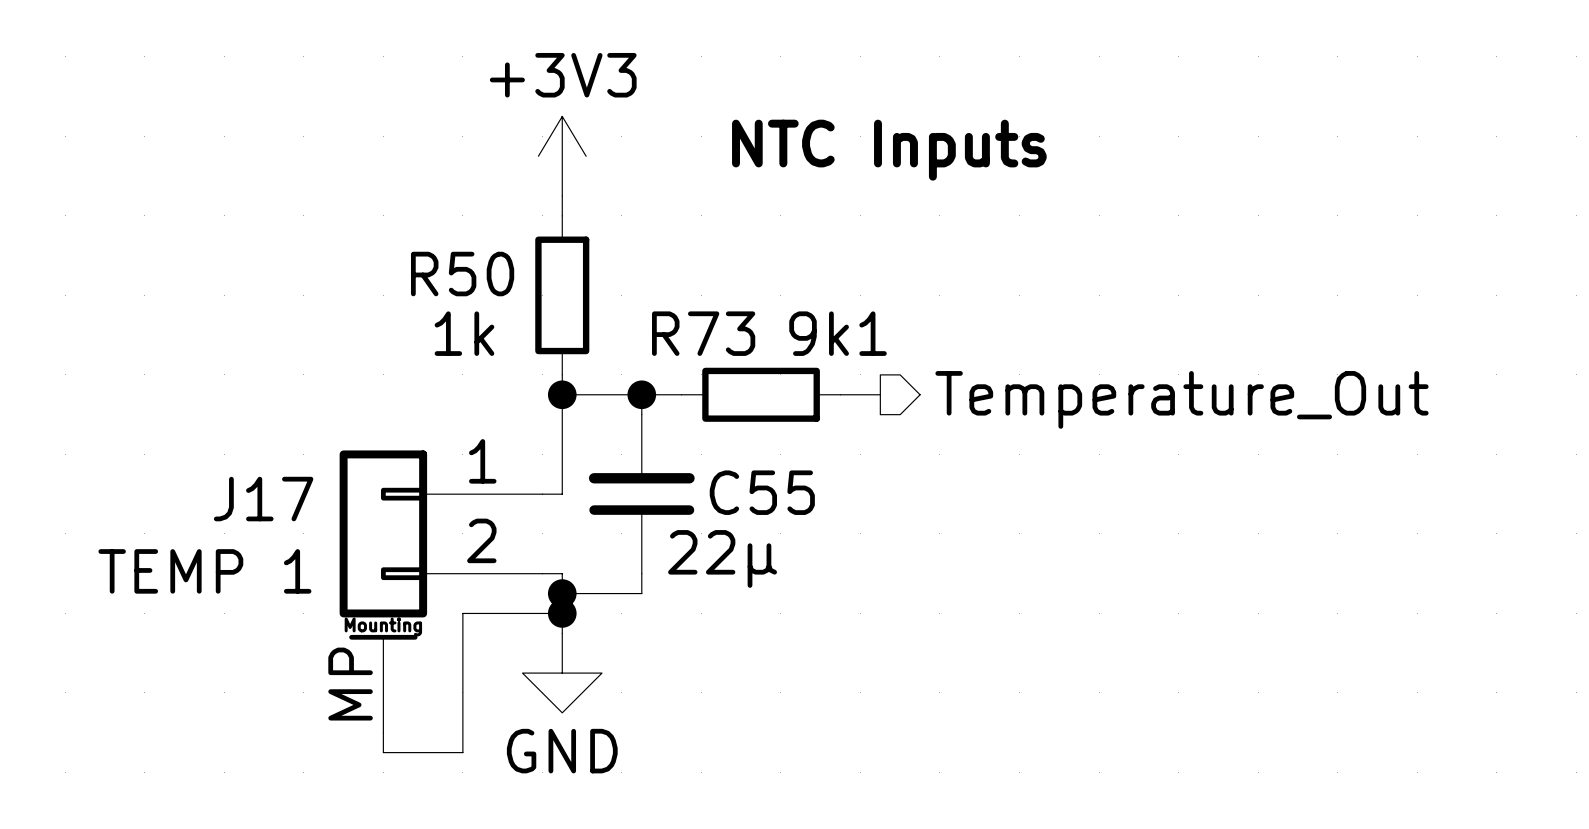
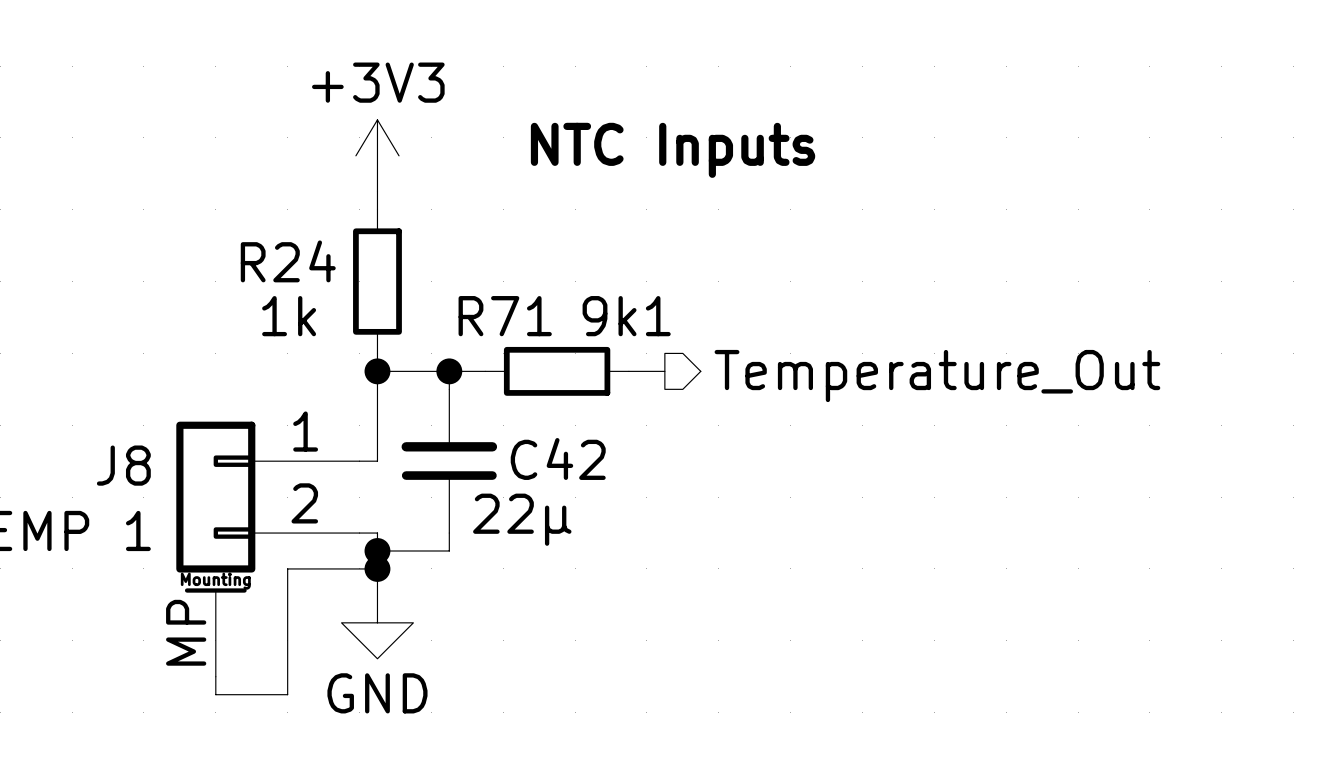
R50 name: R50 (462, 274) -> R24 (288, 261)
R73 name: R73 (703, 333) -> R71 (505, 316)
C55 name: C55 (762, 492) -> C42 (558, 458)
J17 name: J17 (263, 499) -> J8 (123, 465)

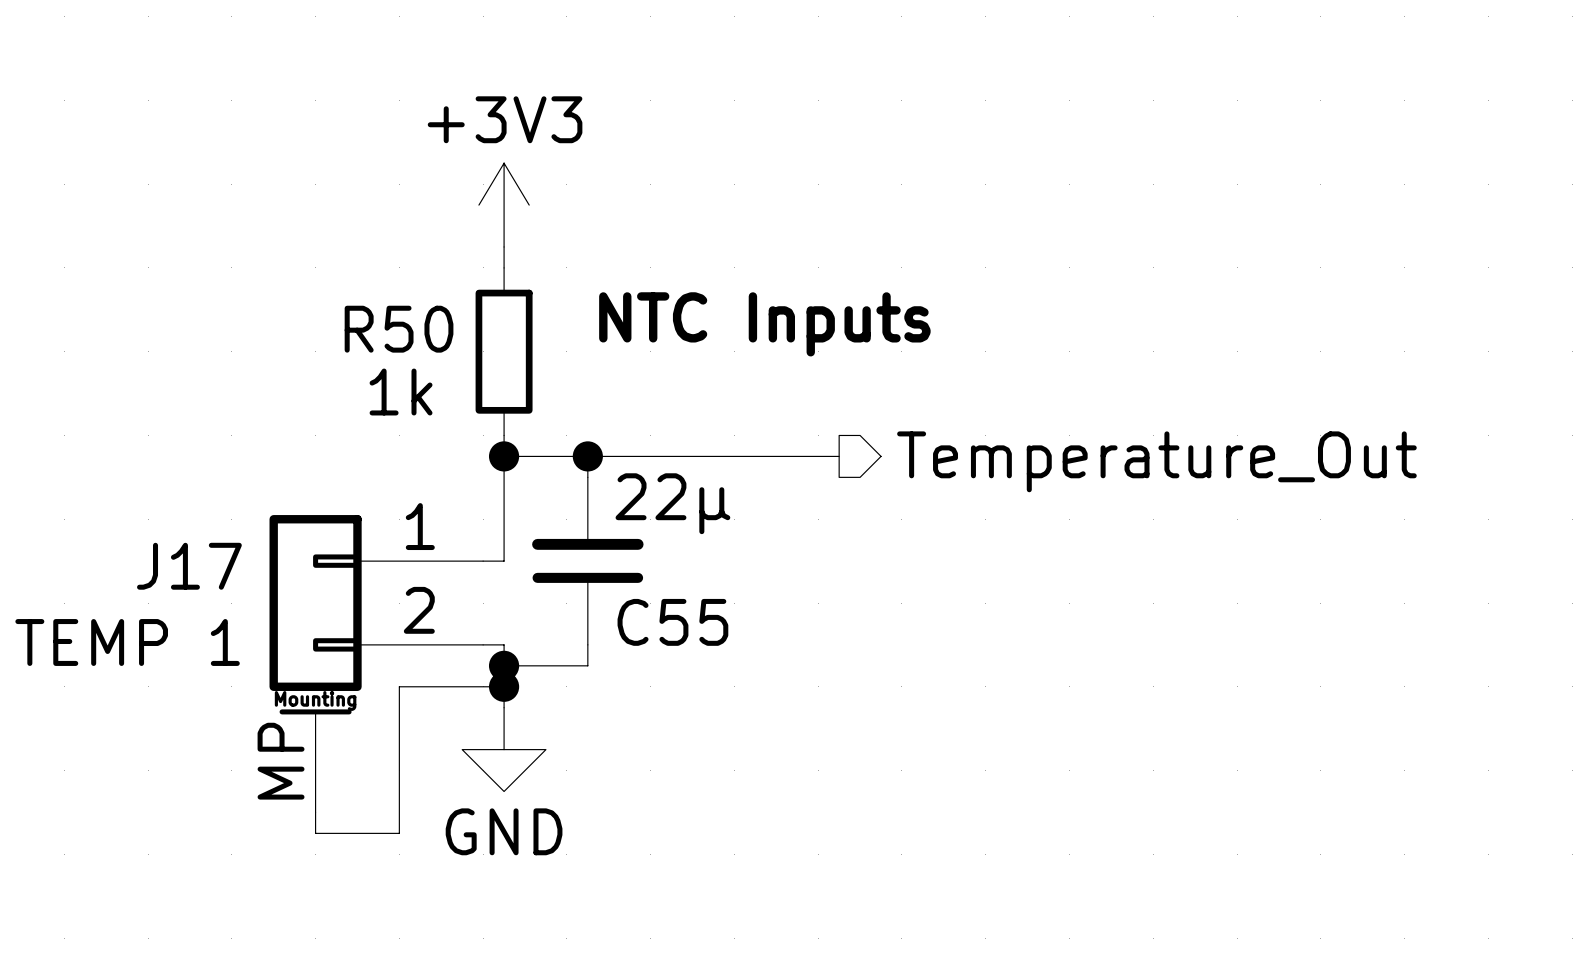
text position: NTC Inputs (673, 150) -> NTC Inputs (764, 324)
R24 name: R24 (288, 261) -> R50 (399, 329)
wire: none -> (629, 456) (797, 456)
R71: 9k1 (557, 371) -> none
C42 name: C42 (558, 458) -> C55 (672, 622)
J8 name: J8 (123, 465) -> J17 (189, 566)
C42 value position: 22µ (522, 519) -> 22µ (672, 503)

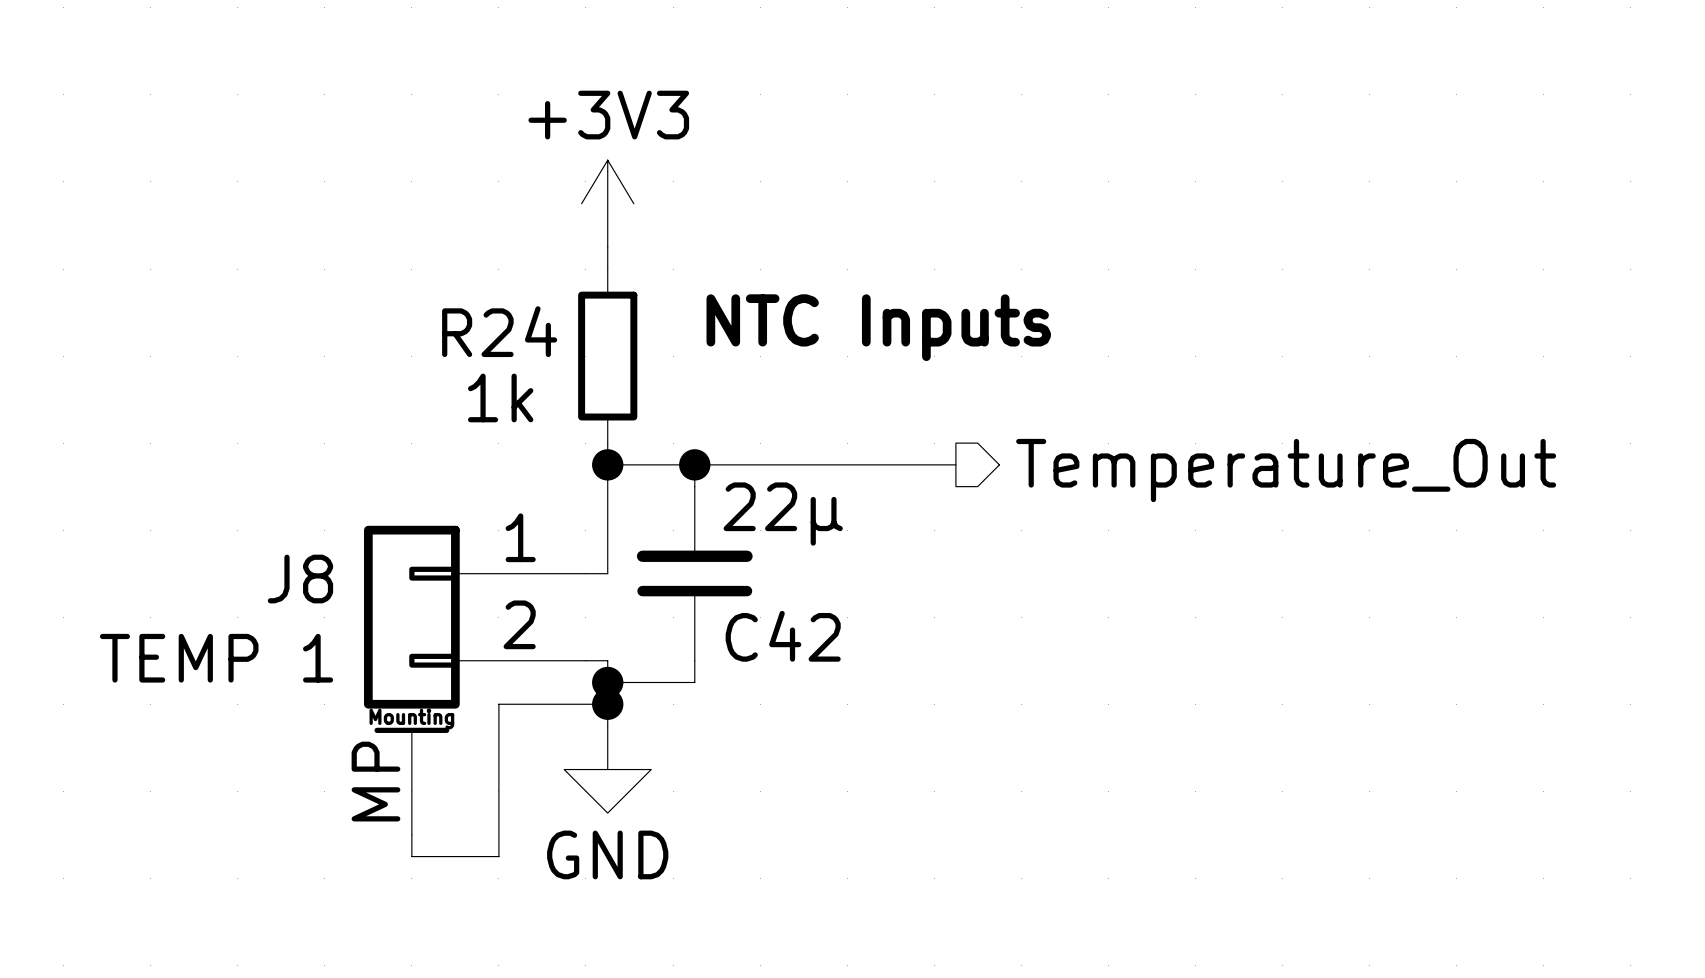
R50 name: R50 (399, 329) -> R24 (499, 331)
J17 name: J17 (189, 566) -> J8 (300, 579)
C55 name: C55 (672, 622) -> C42 (783, 636)

